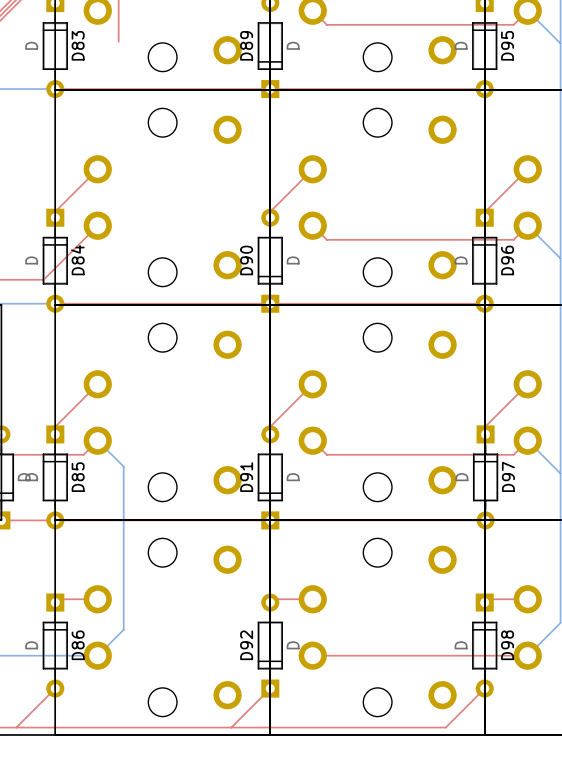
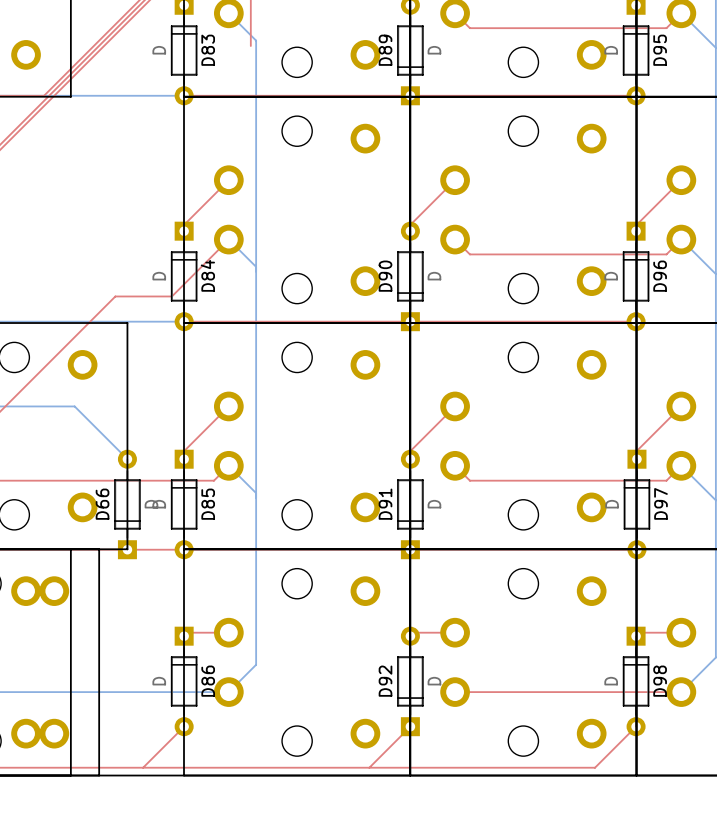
bottom track: none -> (228, 13) (256, 40) (256, 493)
bottom track: none -> (228, 239) (256, 266)

